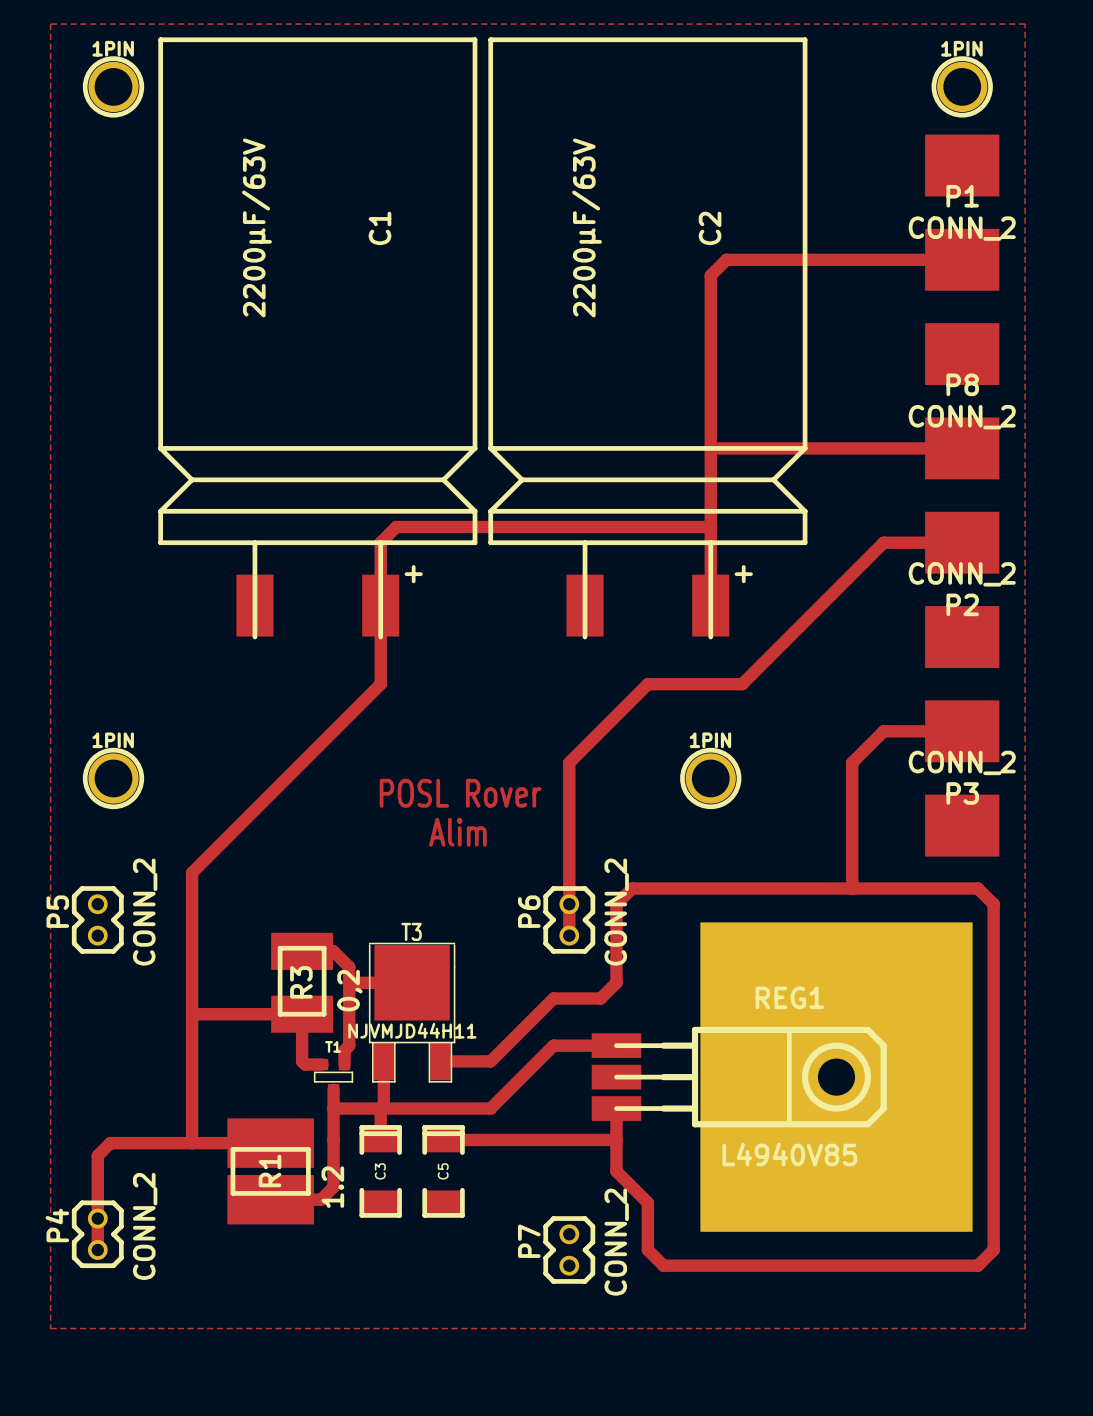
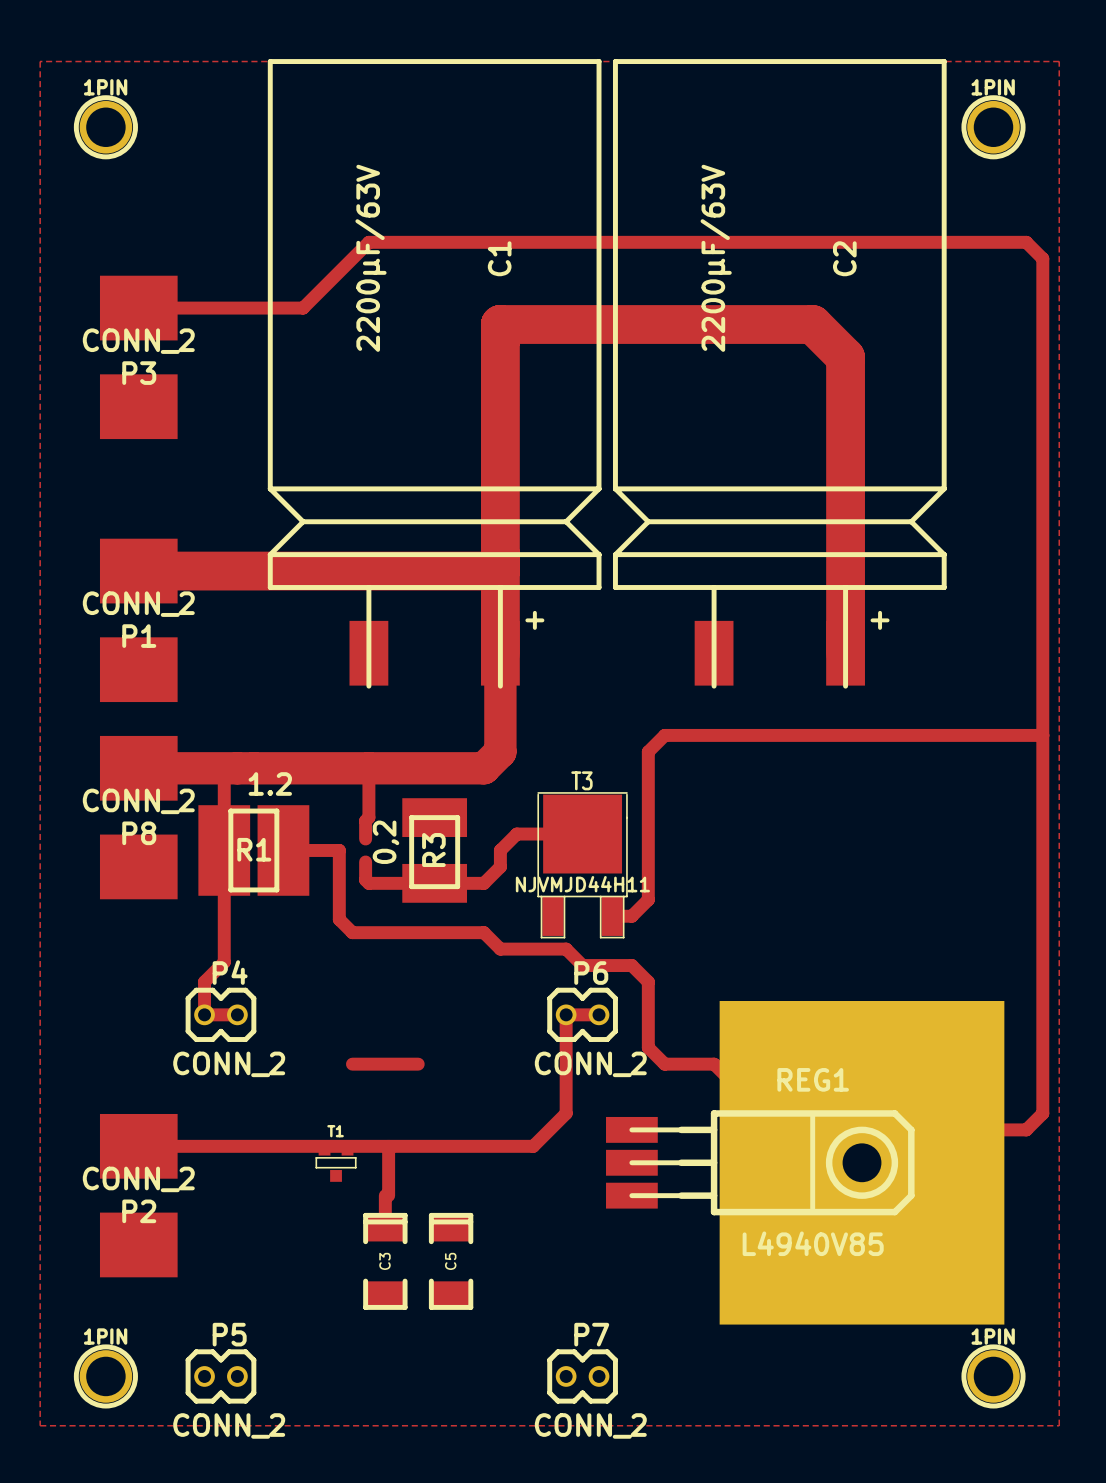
P1 name position: P1 (962, 196) -> P1 (139, 636)
P1 position: (962, 212) -> (138, 620)
P1 value position: CONN_2 (962, 228) -> CONN_2 (138, 604)
track: none -> (138, 308) (303, 308) (368, 242) (1026, 242) (1042, 258) (1042, 1113) (1026, 1129) (878, 1129)
track: (962, 259) (726, 259) (710, 275) (710, 605) -> none
C1 position: (317, 338) -> (434, 373)
C2 position: (647, 338) -> (779, 373)
P8 name position: P8 (962, 384) -> P8 (139, 833)
P8 position: (962, 401) -> (138, 817)
P8 value position: CONN_2 (962, 417) -> CONN_2 (138, 801)
track: (710, 448) (962, 448) -> none
track: none -> (138, 571) (500, 571)
track: (710, 527) (396, 527) (380, 542) (380, 684) (192, 872) (192, 1143) -> none
track: (962, 542) (883, 542) (742, 684) (647, 684) (569, 762) (569, 935) -> none
track: none -> (845, 653) (845, 357) (812, 324) (500, 324) (500, 751) (483, 768) (138, 768)
P2 position: (962, 589) -> (138, 1195)
track: none -> (1042, 735) (664, 735) (648, 751) (648, 899) (631, 916) (612, 916)
track: none -> (237, 768) (224, 768) (224, 962) (204, 981) (204, 1014) (237, 1014)
track: none -> (368, 768) (368, 817) (365, 820) (365, 838)
track: (962, 731) (883, 731) (852, 762) (852, 888) -> none
track: none -> (582, 834) (516, 834) (500, 850) (500, 866) (483, 883) (368, 883) (365, 880) (365, 861)
1PIN: (113, 778) -> none
track: none -> (283, 850) (339, 850) (339, 919) (352, 932) (483, 932) (500, 949) (566, 949) (582, 965) (631, 965) (648, 981) (648, 1047) (664, 1064) (714, 1064) (730, 1080) (730, 1129) (812, 1129)
1PIN: (710, 778) -> none
P3 position: (962, 778) -> (138, 357)
text: POSL Rover (460, 793) -> none
text: Alim (457, 832) -> none
P5 rotation: 0° (97, 919) -> 90° clockwise (220, 1376)
P5 position: (97, 919) -> (220, 1376)
P6 rotation: 0° (569, 919) -> 90° clockwise (582, 1014)
track: (302, 951) (333, 951) (349, 967) (349, 1045) (344, 1050) (344, 1064) -> none
R3 rotation: 0° (302, 982) -> 180° (434, 850)
R3 position: (302, 982) -> (434, 850)
T3 position: (412, 1012) -> (582, 865)
track: (192, 1014) (302, 1014) (302, 1061) (305, 1064) (322, 1064) -> none
track: (616, 1045) (553, 1045) (490, 1108) (333, 1108) -> none
track: none -> (138, 1146) (447, 1146)
track: (490, 1061) (553, 998) (600, 998) (616, 982) (616, 904) (632, 888) (977, 888) (993, 904) (993, 1249) (977, 1265) (663, 1265) (647, 1249) (647, 1202) (616, 1171) (616, 1108) -> (500, 1146) (533, 1146) (566, 1113) (566, 1014) (599, 1014)
track: (333, 1089) (333, 1187) (320, 1199) (270, 1199) -> none
track: (443, 1139) (616, 1139) -> none
track: (270, 1143) (110, 1143) (97, 1155) (97, 1249) -> none
R1 rotation: 0° (270, 1171) -> 90° clockwise (253, 850)
R1 position: (270, 1171) -> (253, 850)
R1 value position: 1.2 (332, 1187) -> 1.2 (270, 784)
P4 rotation: 0° (97, 1234) -> 90° clockwise (220, 1014)
P4 position: (97, 1234) -> (220, 1014)
P7 rotation: 0° (569, 1249) -> 90° clockwise (582, 1376)
1PIN: none -> (105, 1376)
1PIN: none -> (993, 1376)

